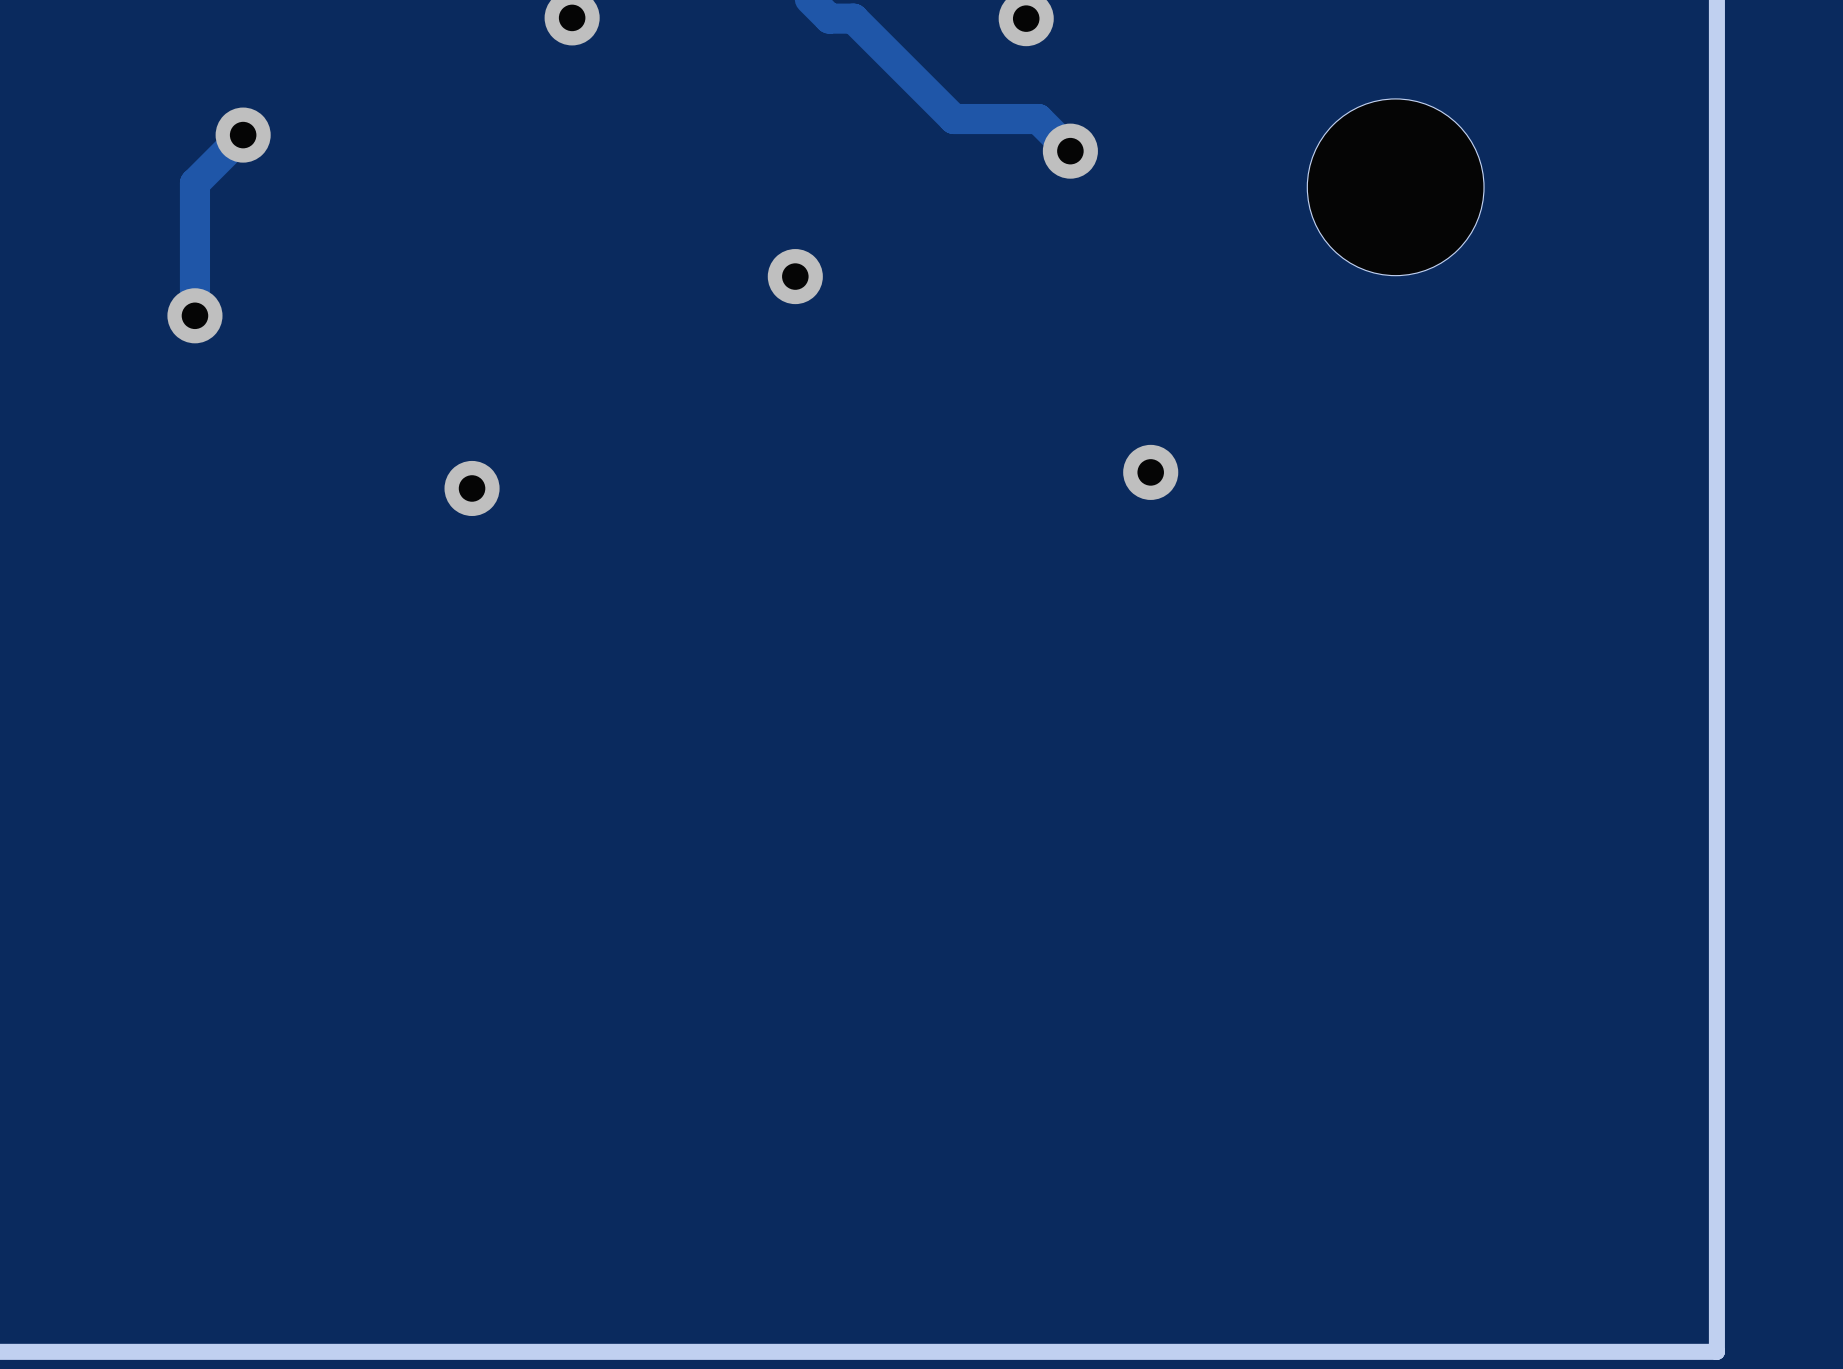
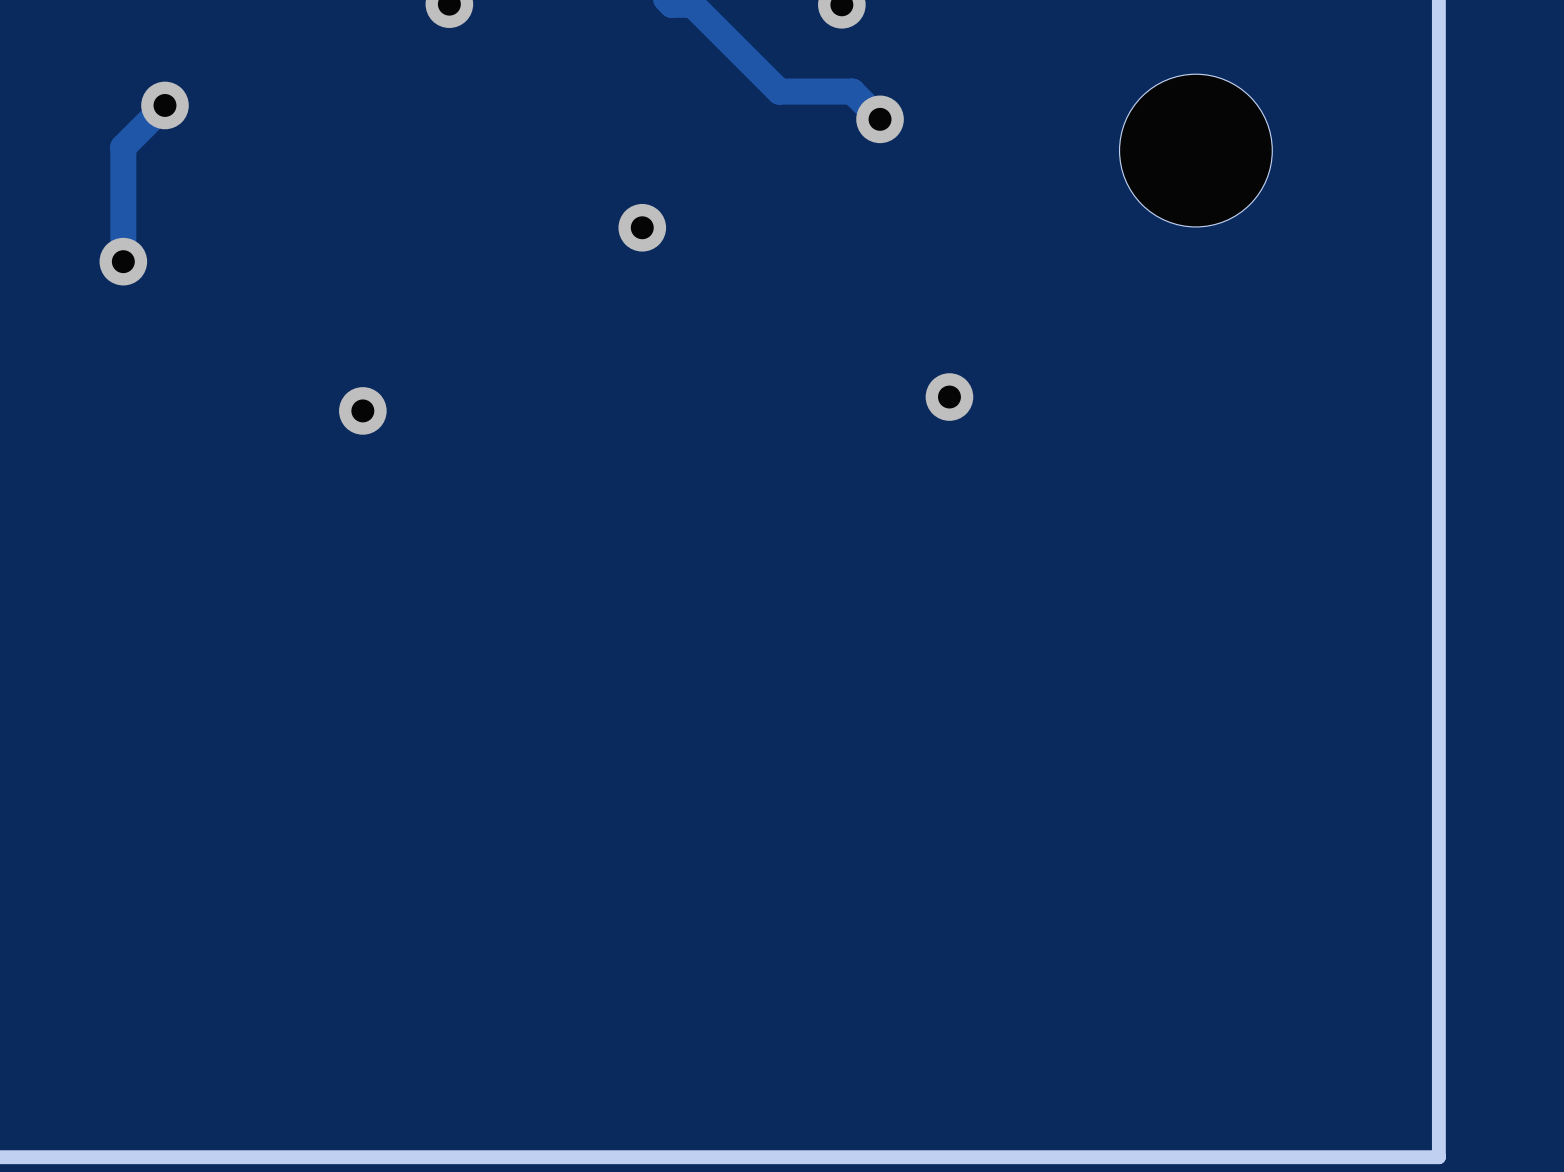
part position: (1395, 187) -> (1195, 150)

